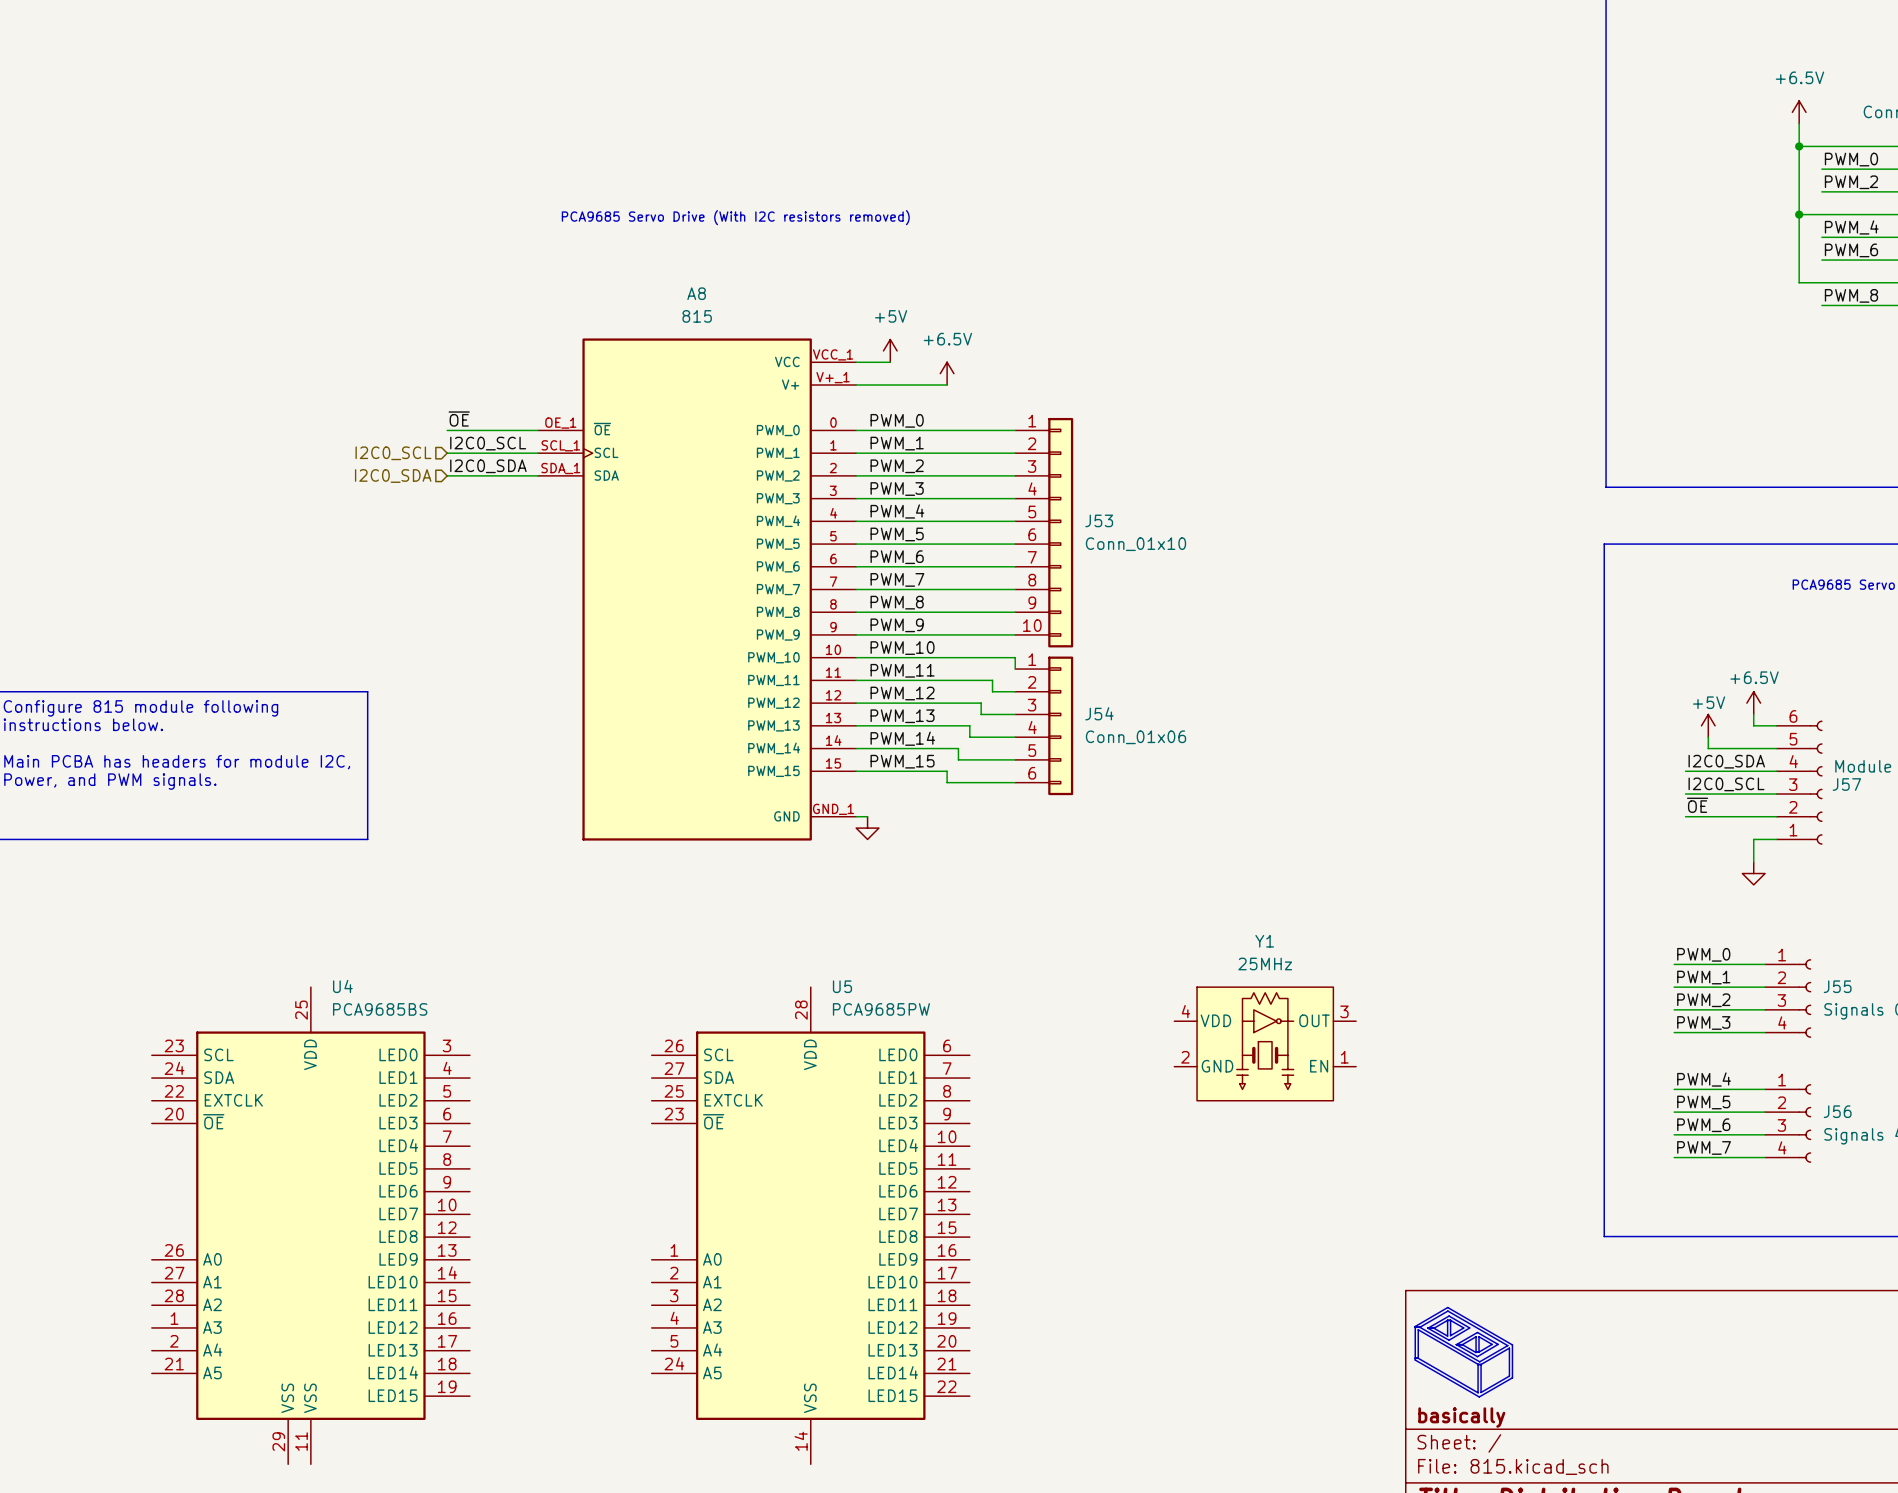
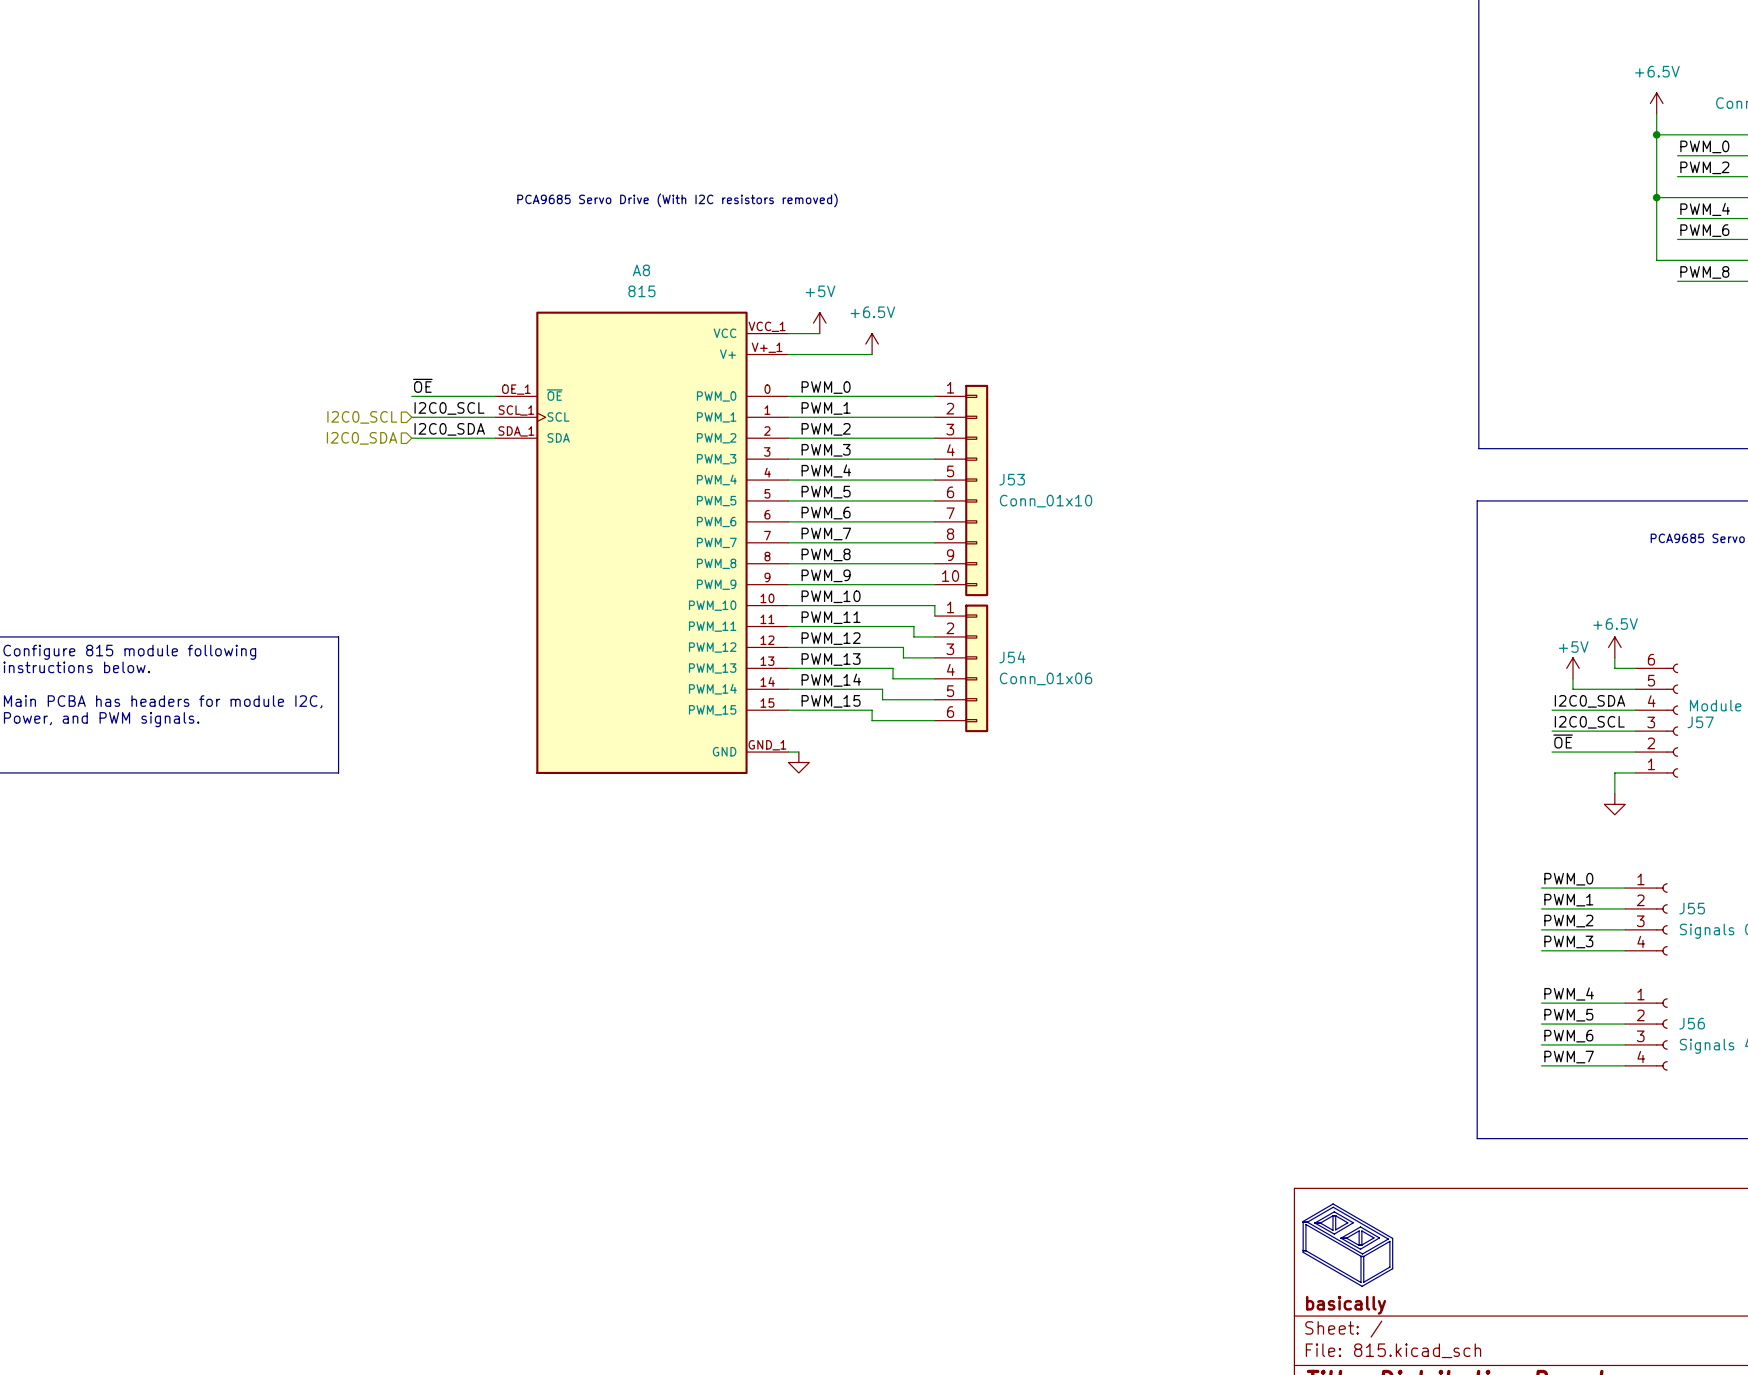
Y1: 25MHz (1265, 1043) -> none
U4: PCA9685BS (310, 1225) -> none
U5: PCA9685PW (810, 1225) -> none

